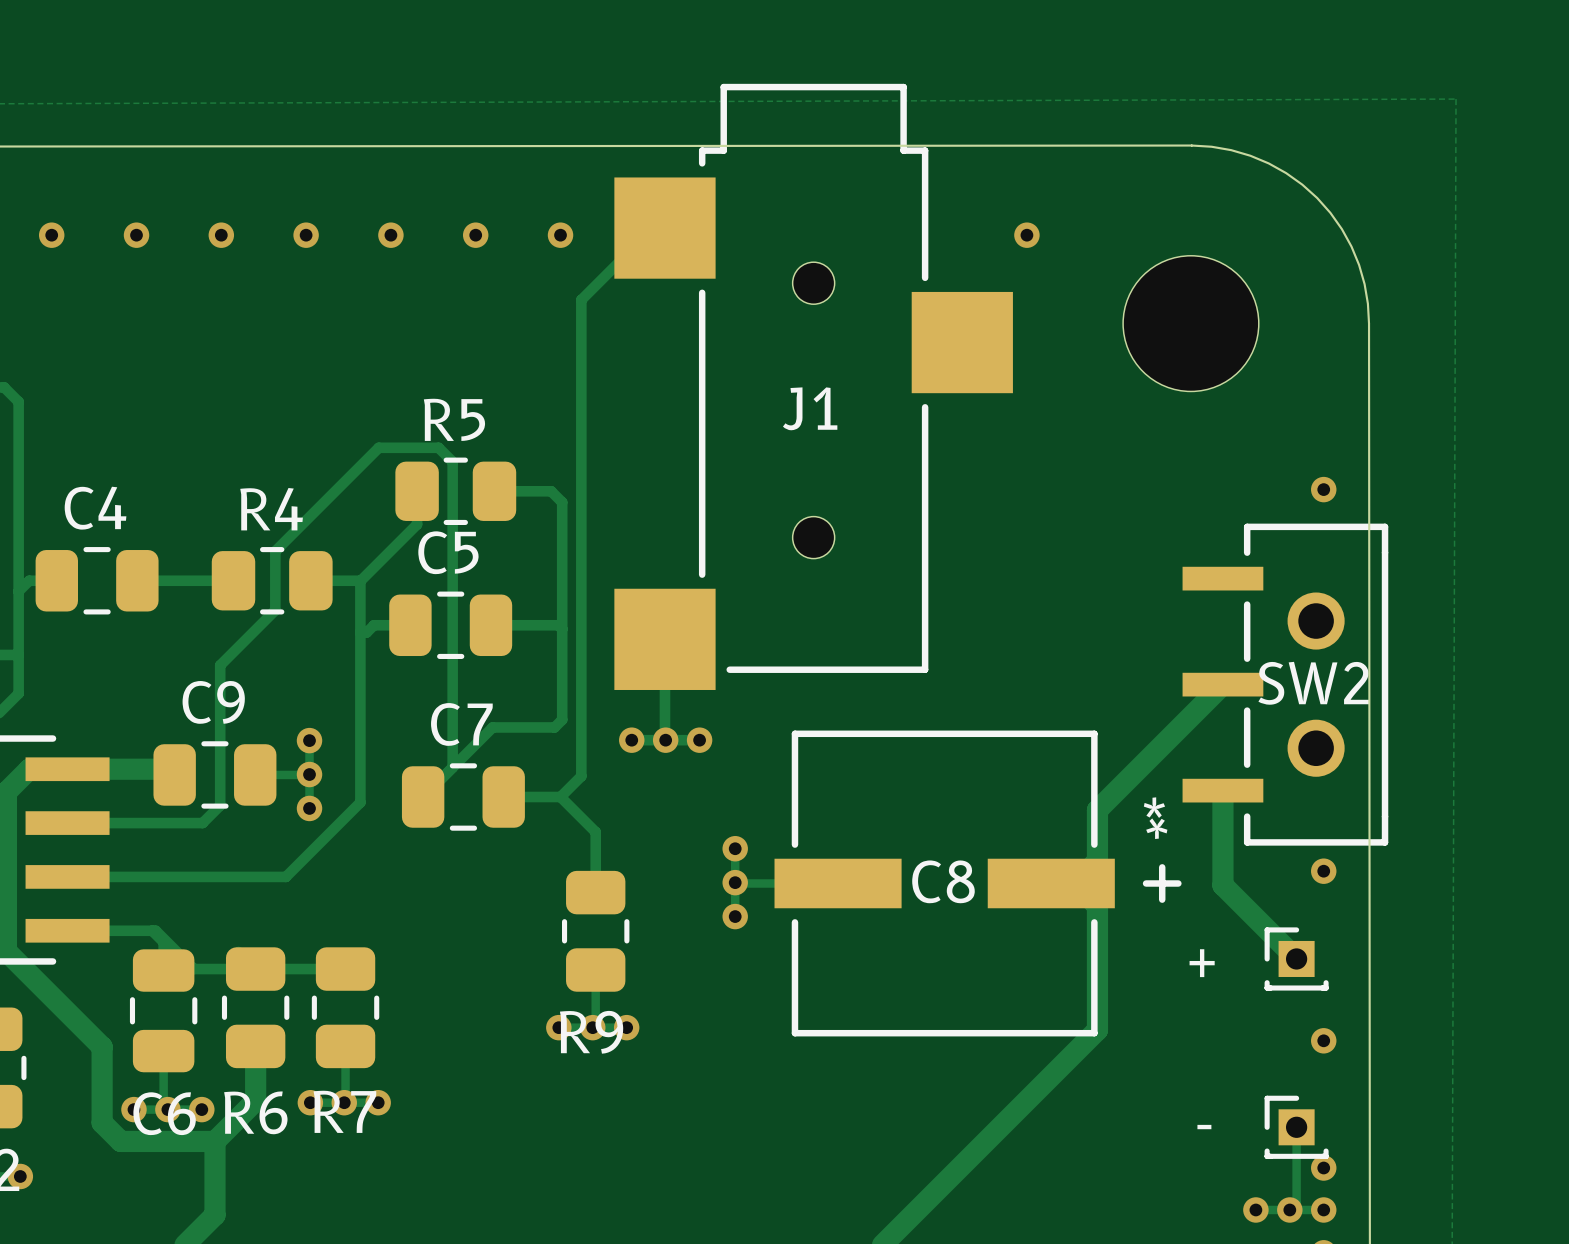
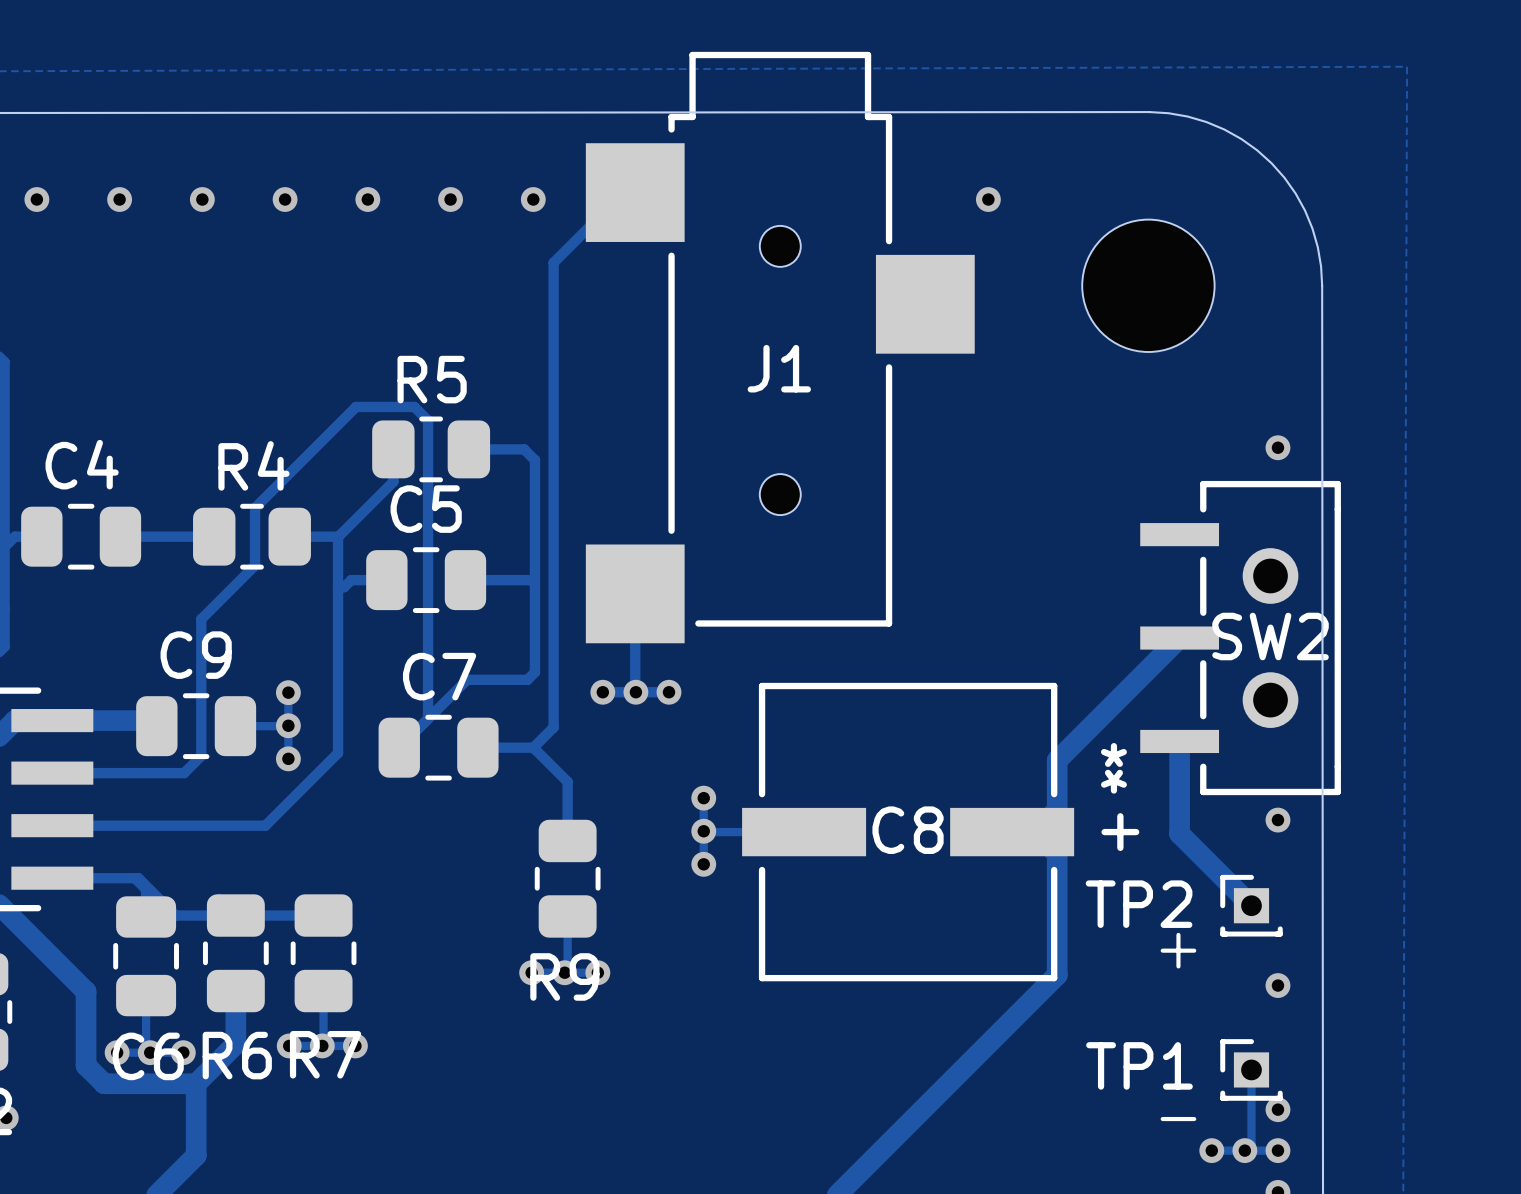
TP2 name: none -> TP2 (1139, 904)
text position: + (1202, 963) -> + (1178, 950)
TP1 name: none -> TP1 (1139, 1065)
text position: - (1204, 1127) -> - (1178, 1119)

